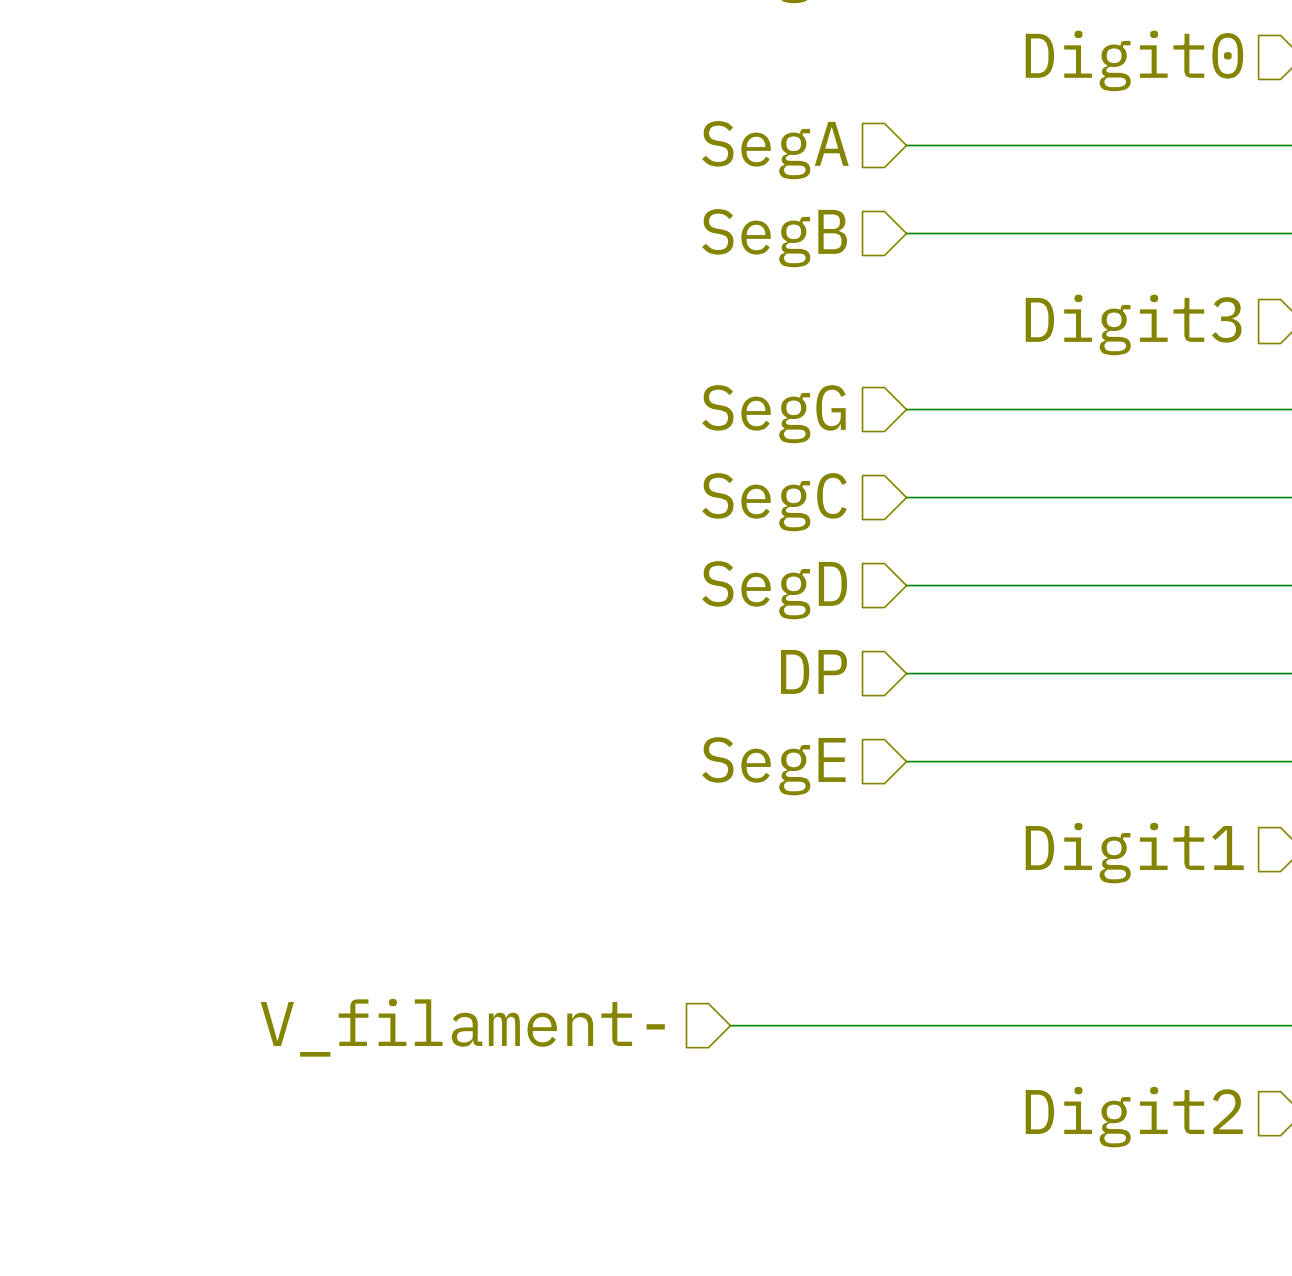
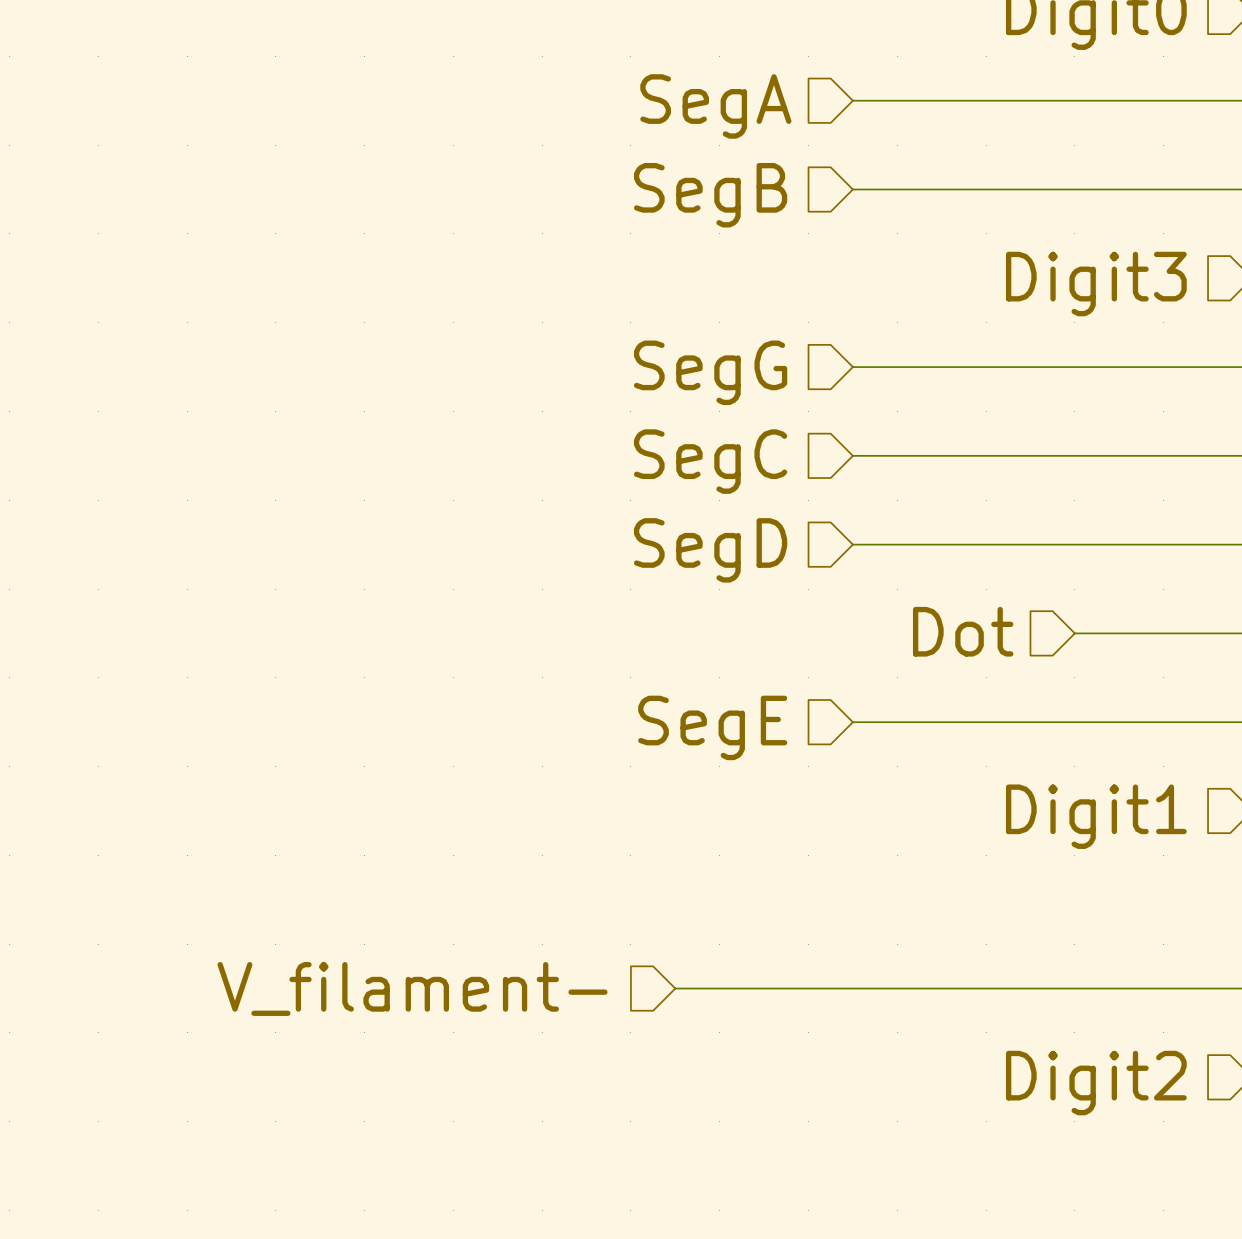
hierarchical label: DP (814, 671) -> none
hierarchical label: none -> Dot (963, 631)
wire: (906, 673) (1126, 673) -> none

